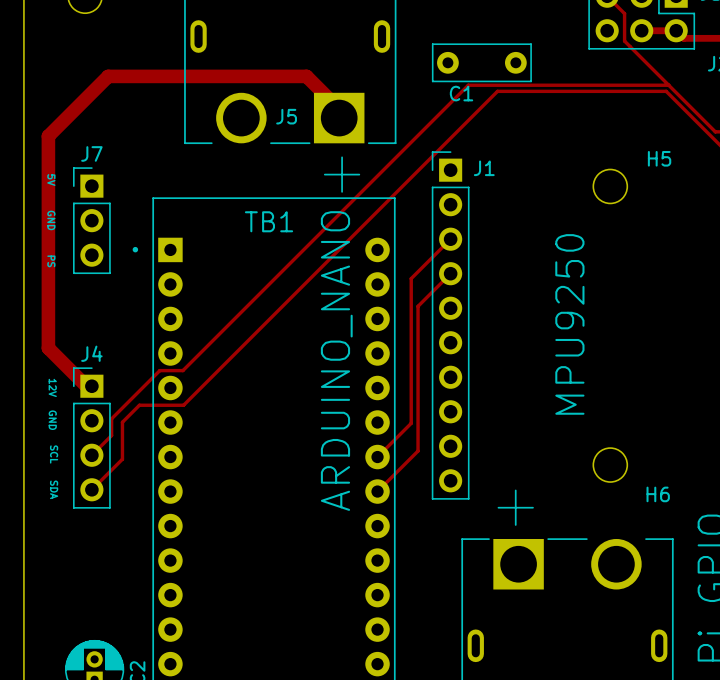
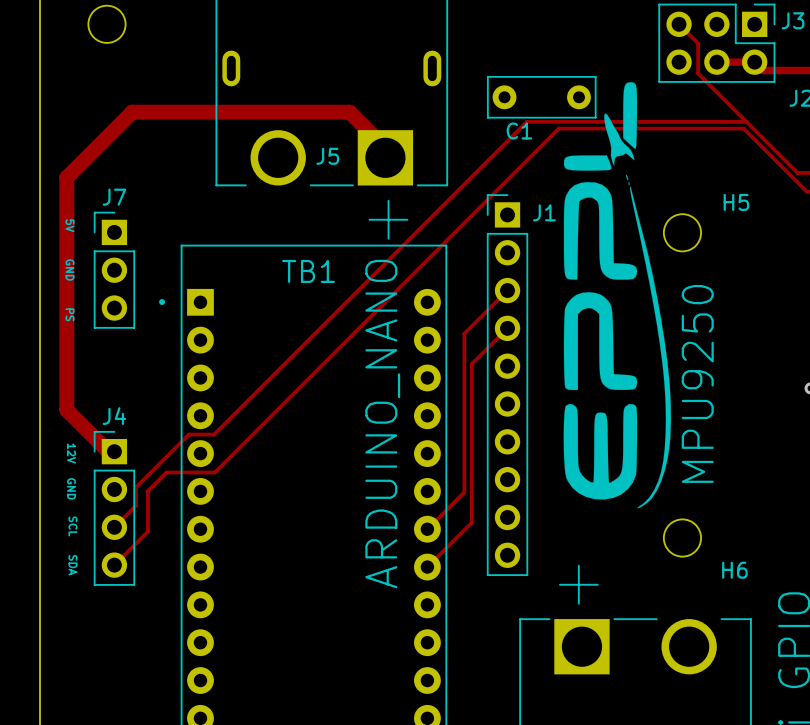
drawing: none -> [563, 82, 671, 509]
text position: MPU9250 (569, 324) -> MPU9250 (697, 383)

